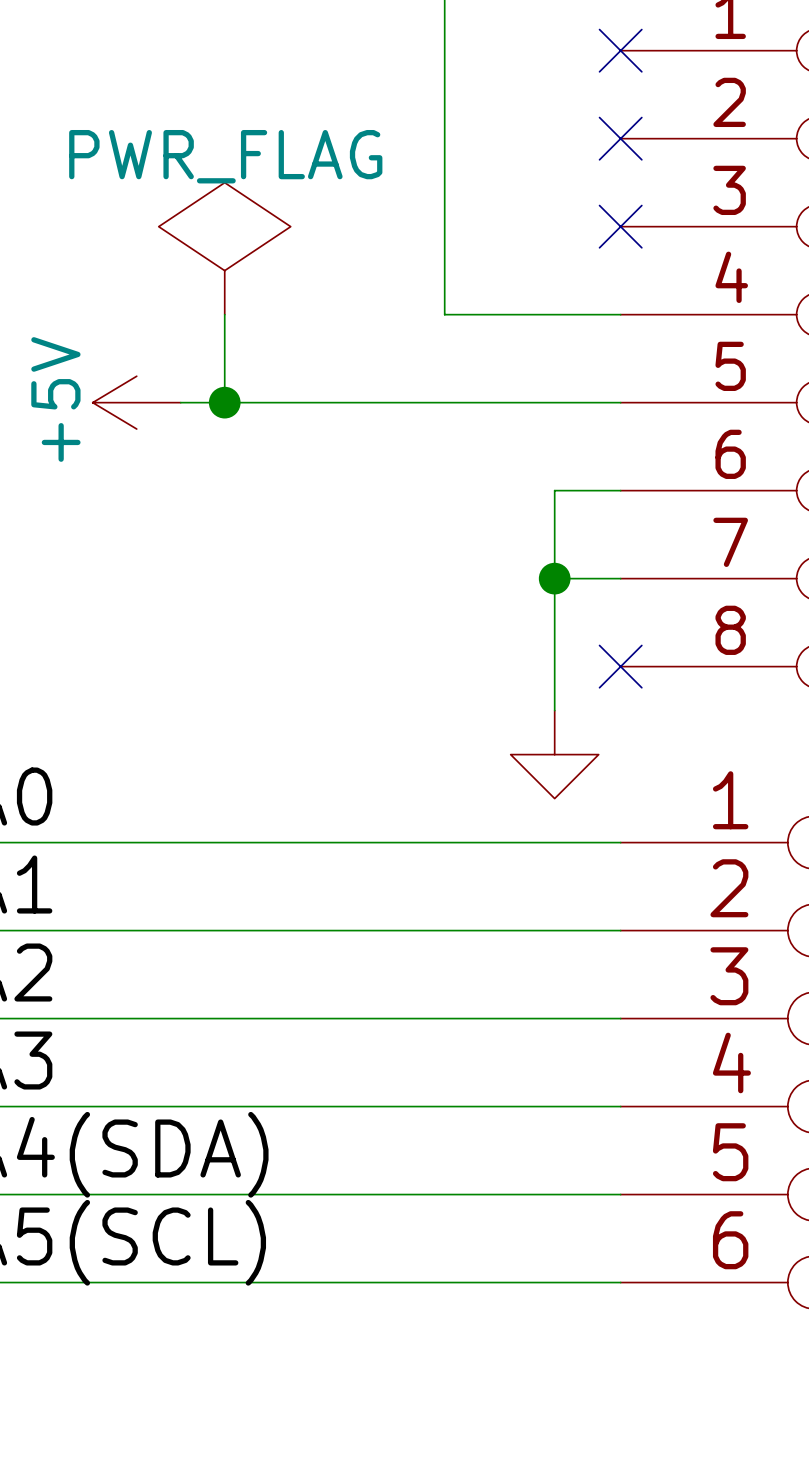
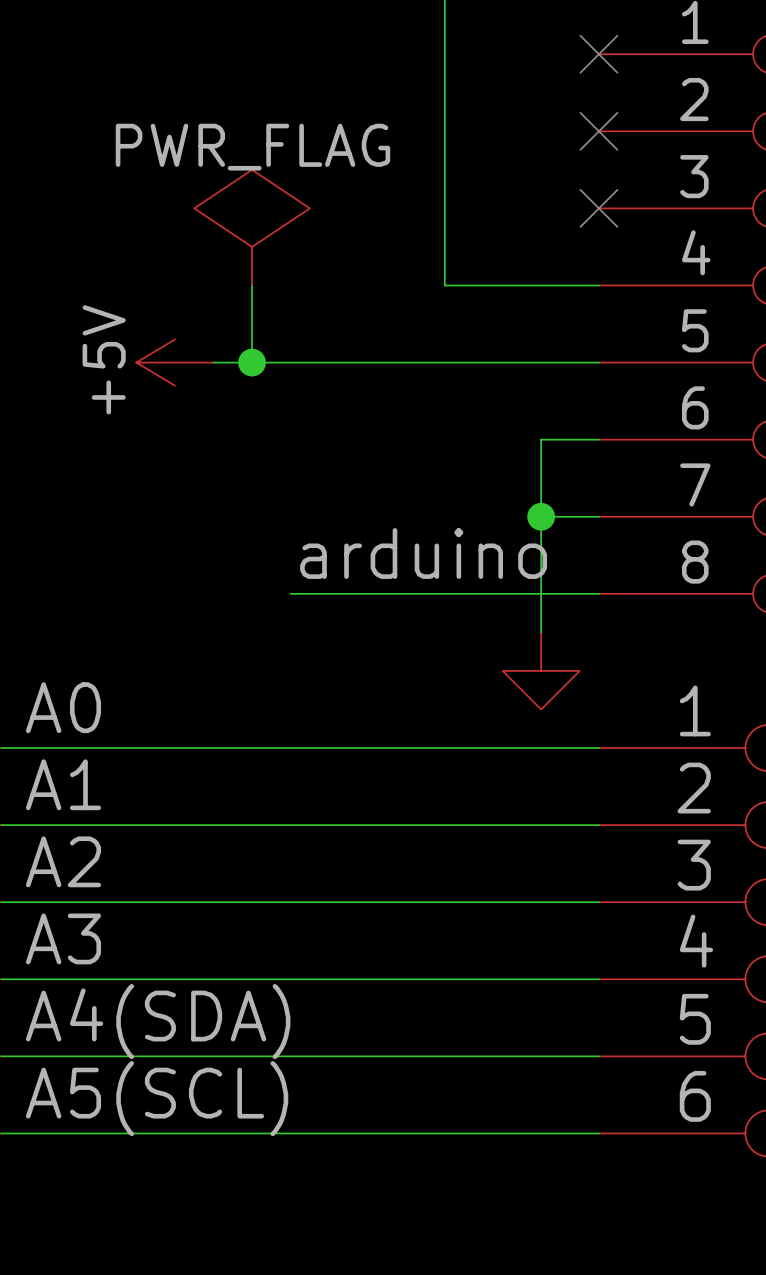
label: none -> arduino (423, 553)
wire: none -> (290, 593) (598, 593)
no-connect mark: (620, 666) -> none

